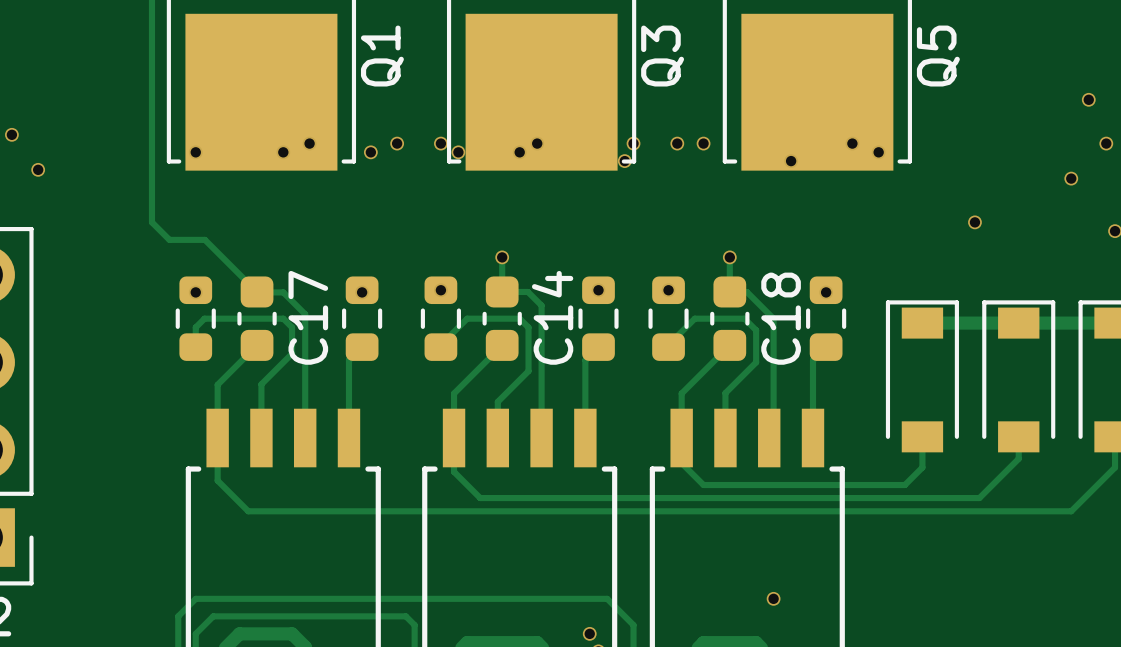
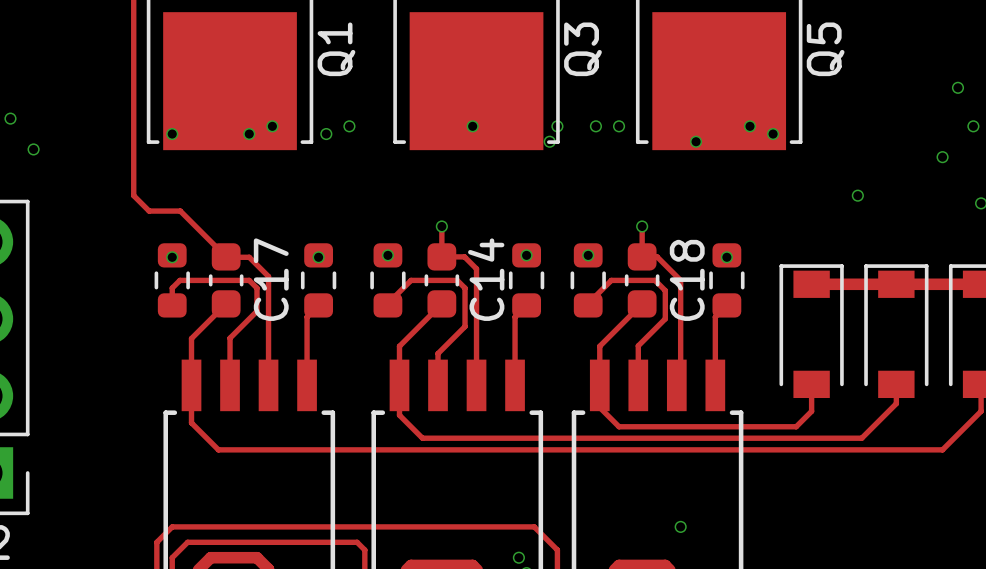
via: (440, 143) -> none
via: (458, 152) -> none
via: (519, 152) -> none

